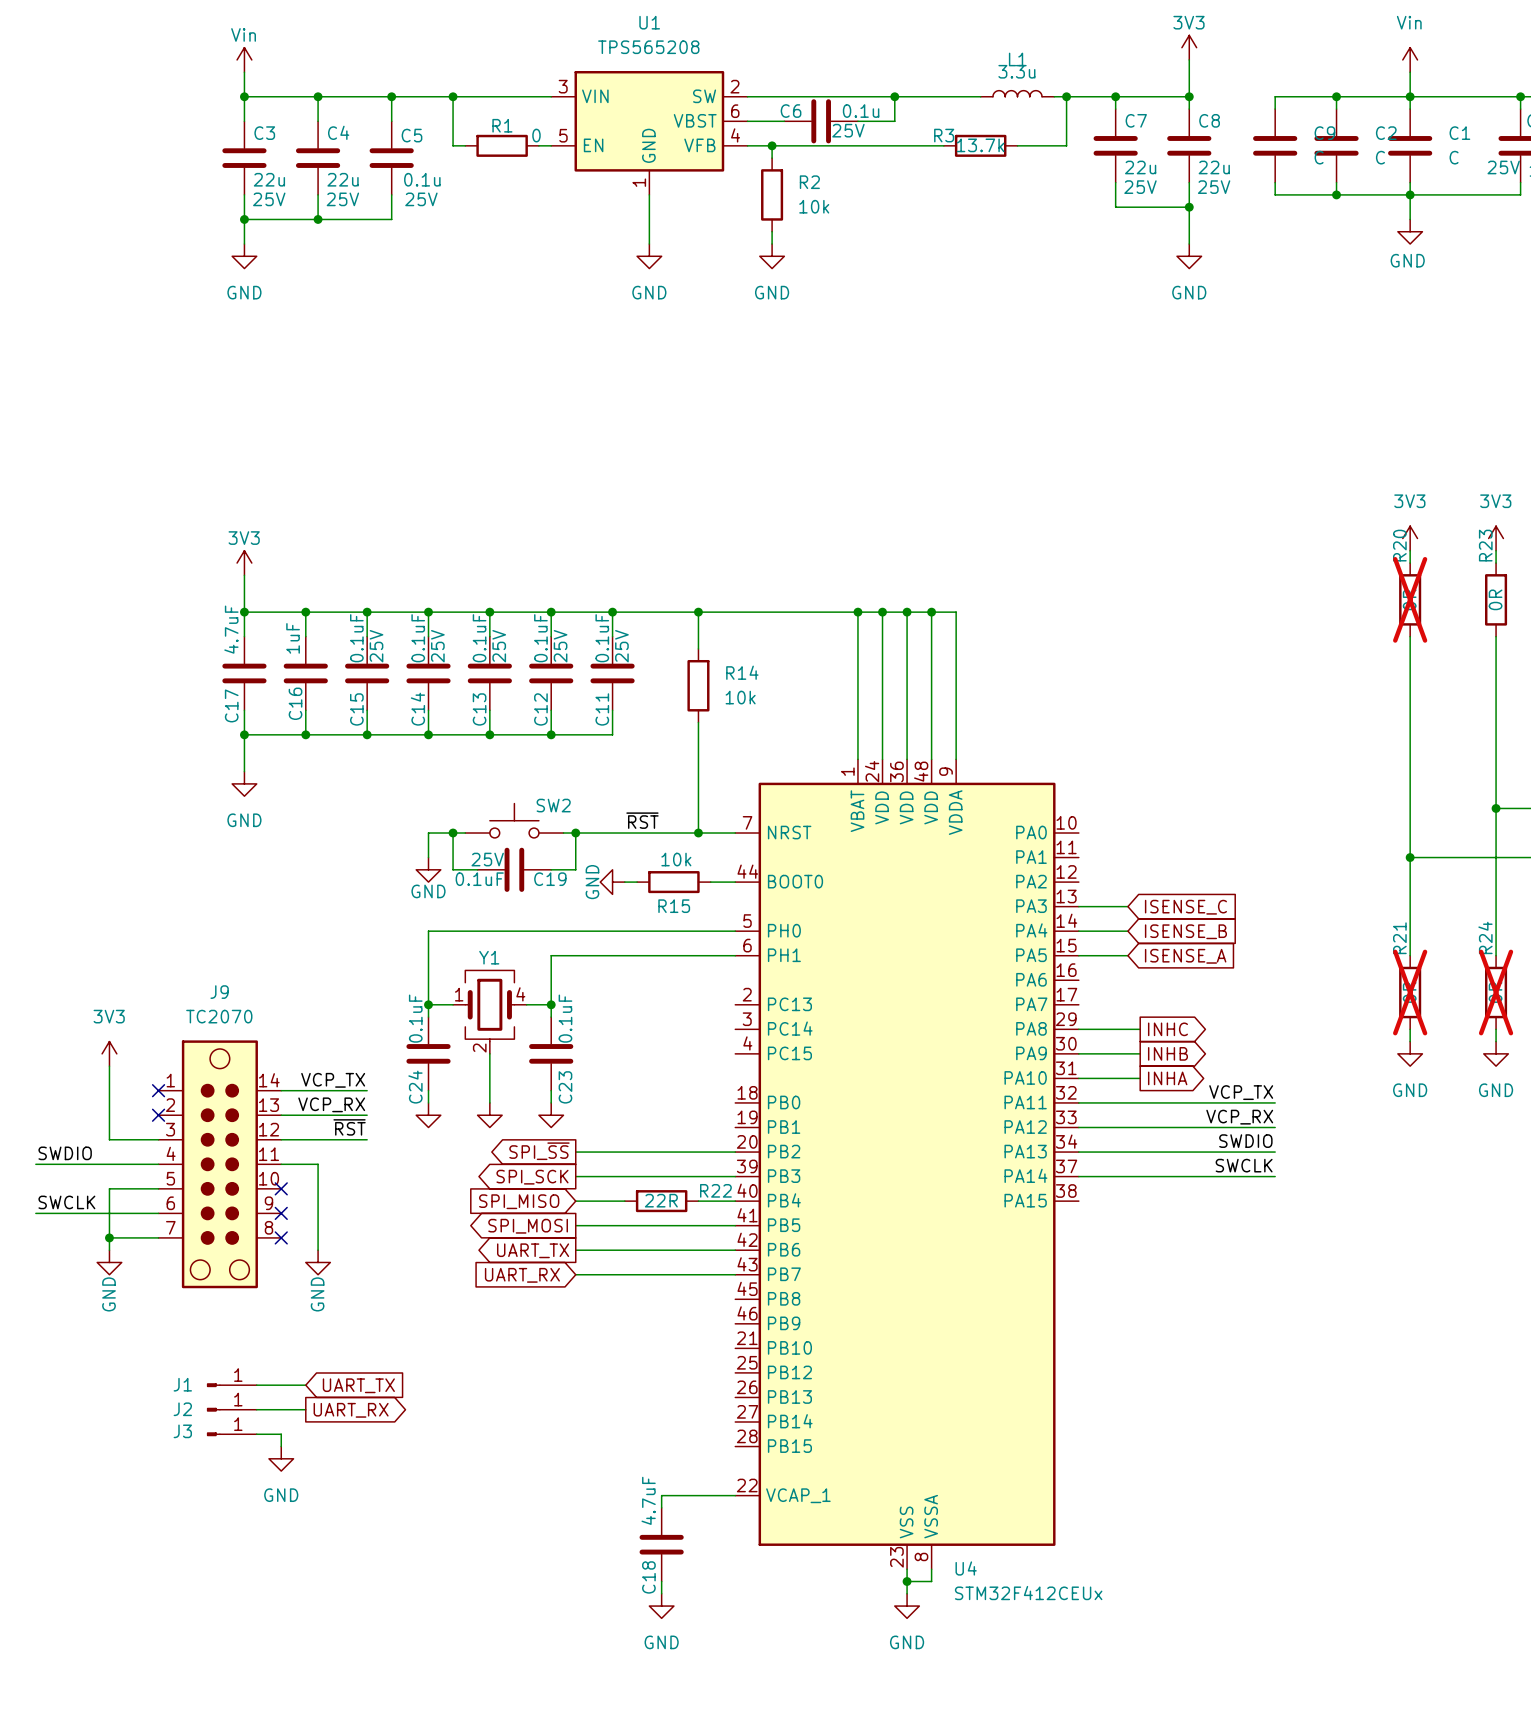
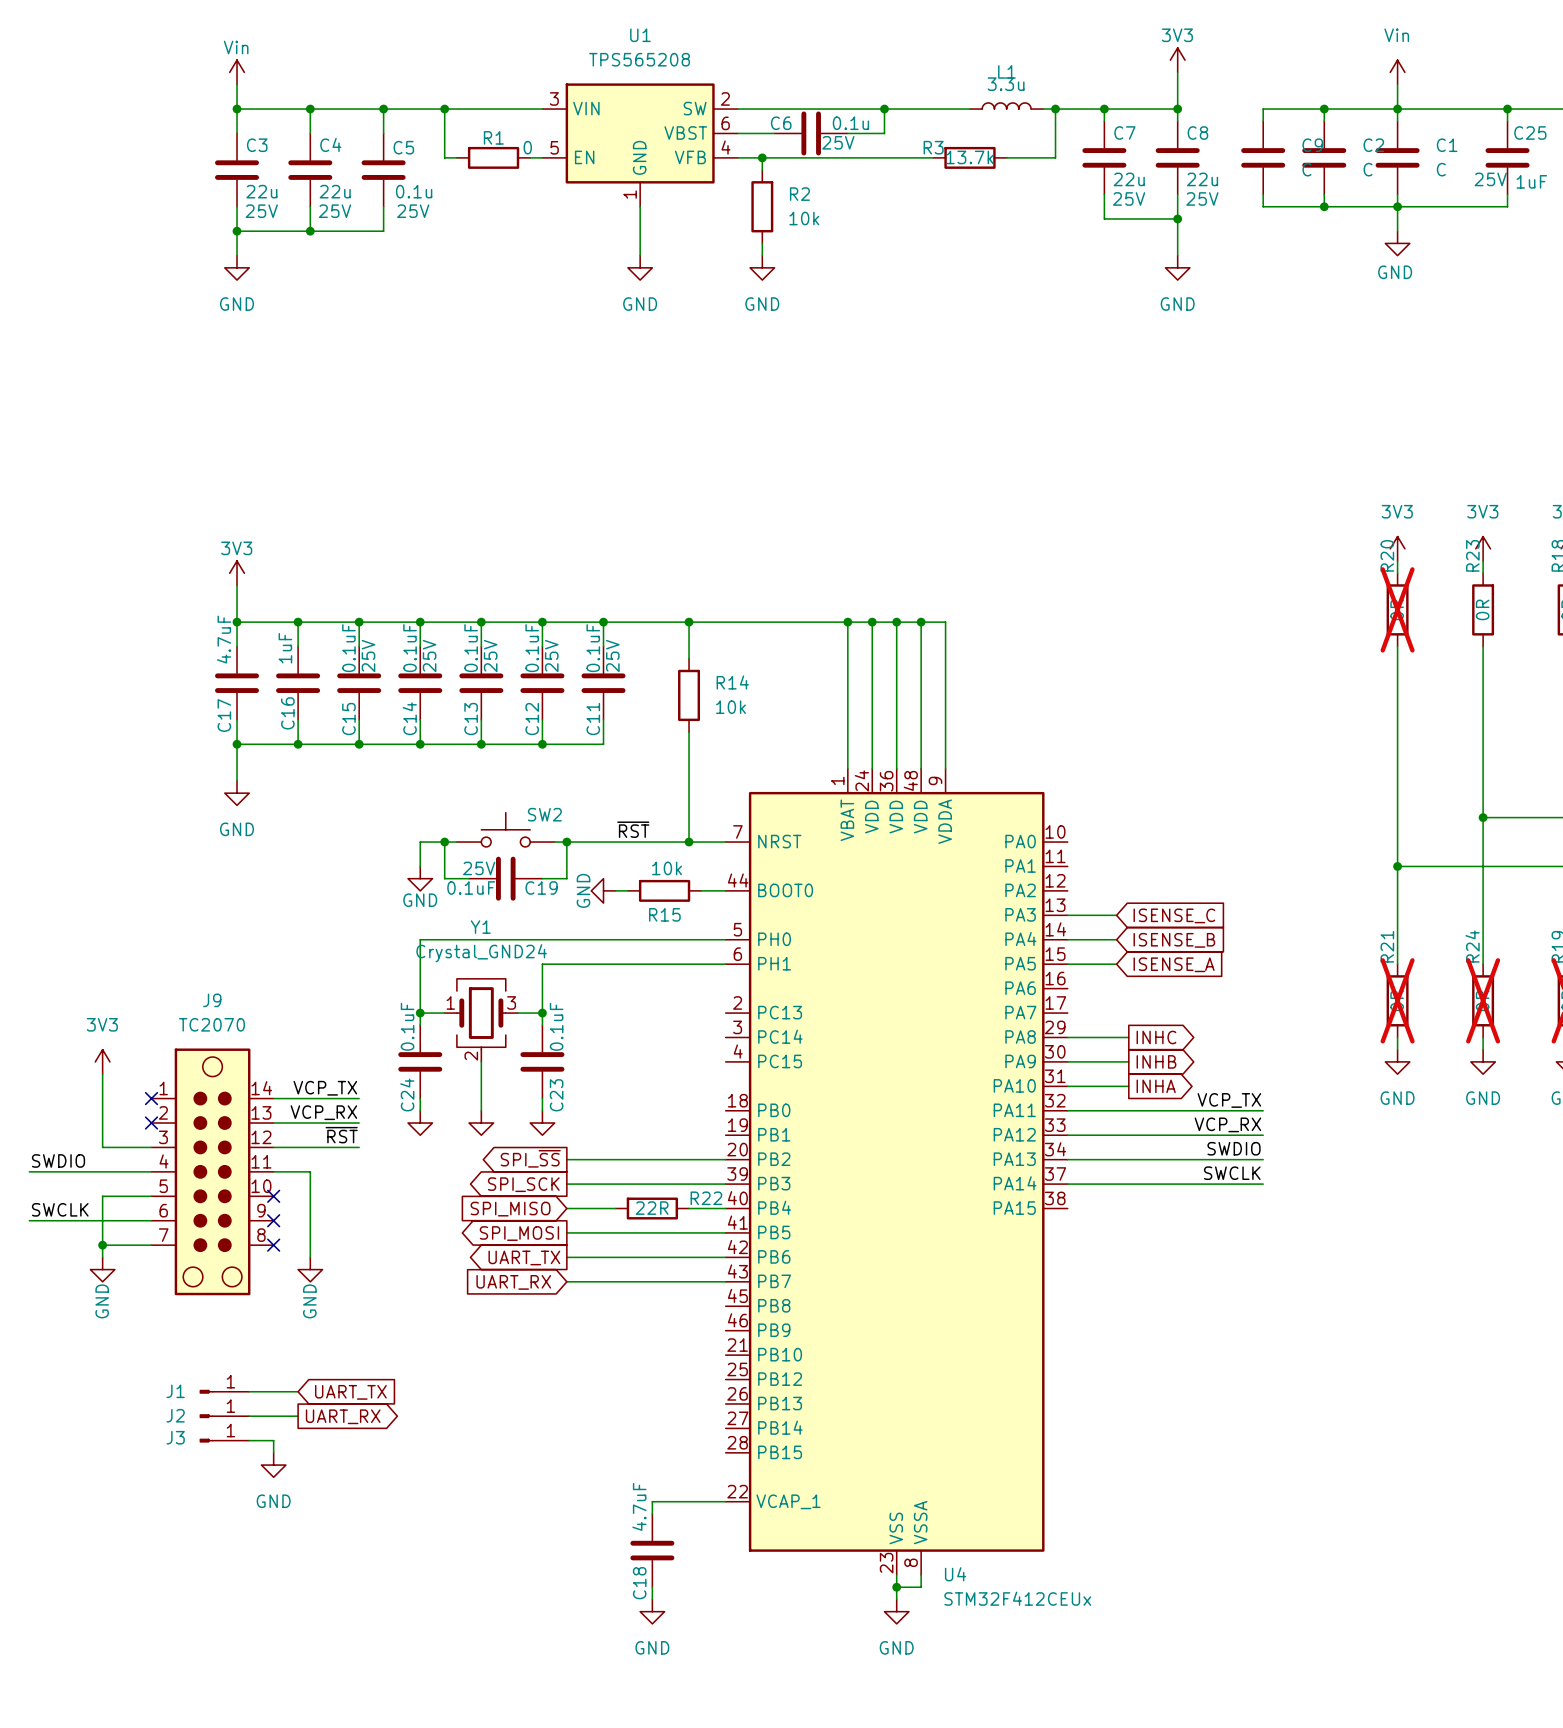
Y1 value: none -> Crystal_GND24 (481, 953)
Y1 name position: Y1 (489, 957) -> Y1 (480, 927)
Y1 pin number: 4 (520, 994) -> 3 (511, 1002)

